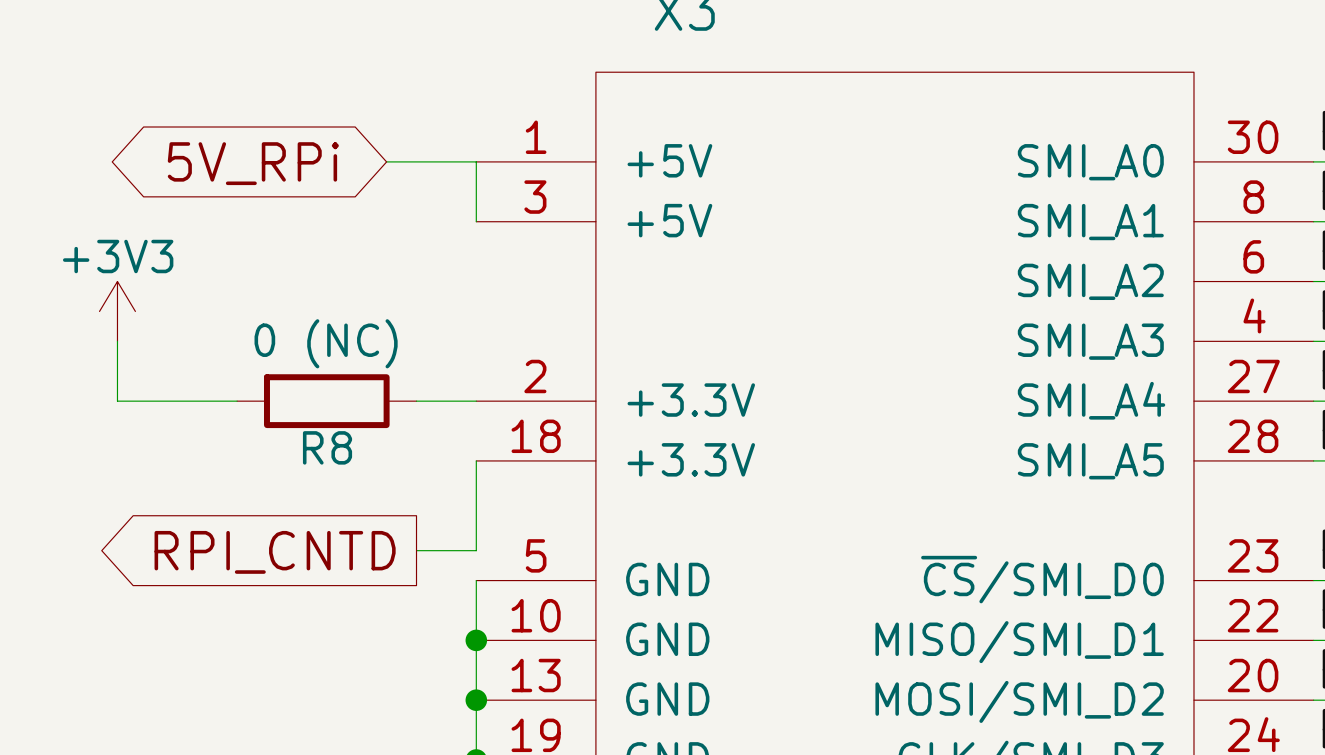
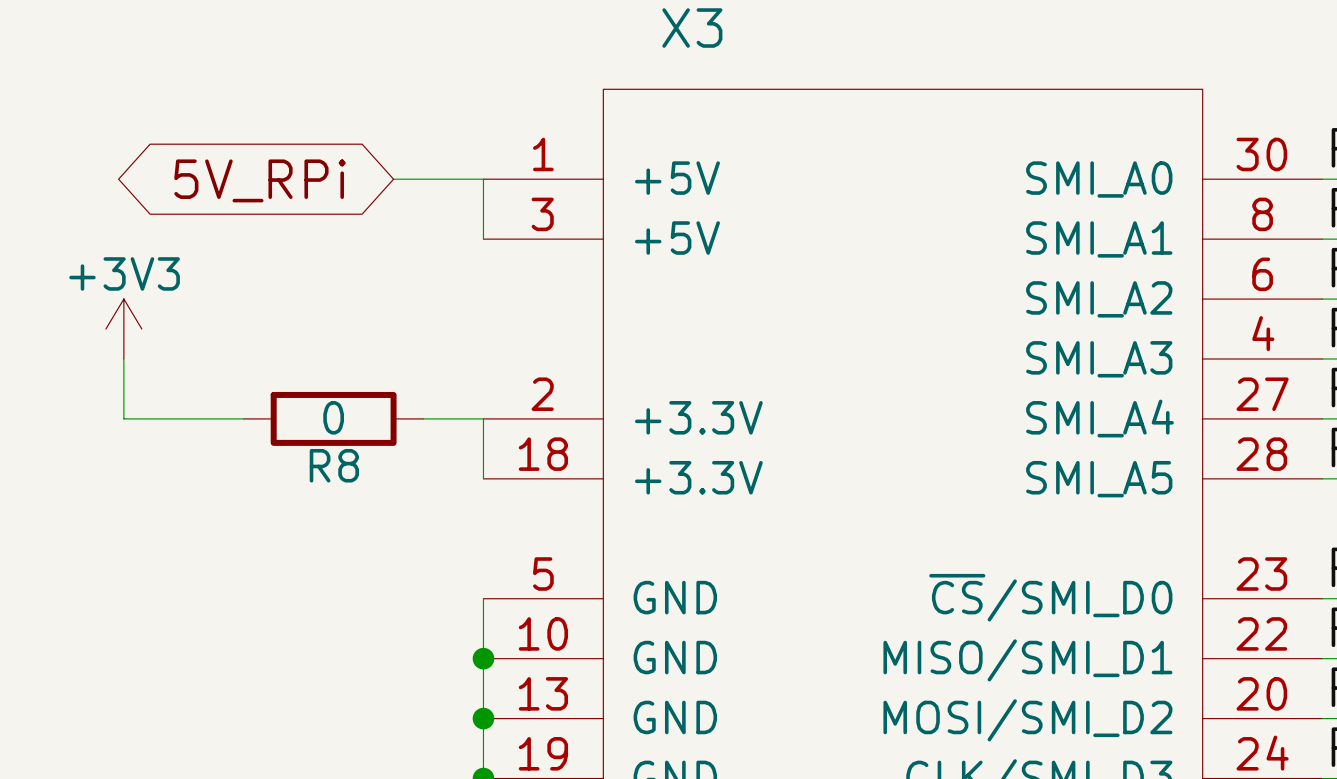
R8 value: 0 (NC) (326, 343) -> 0 (333, 417)
wire: (476, 460) (476, 550) (416, 550) -> (483, 478) (483, 418)
global label: RPI_CNTD (275, 552) -> none

